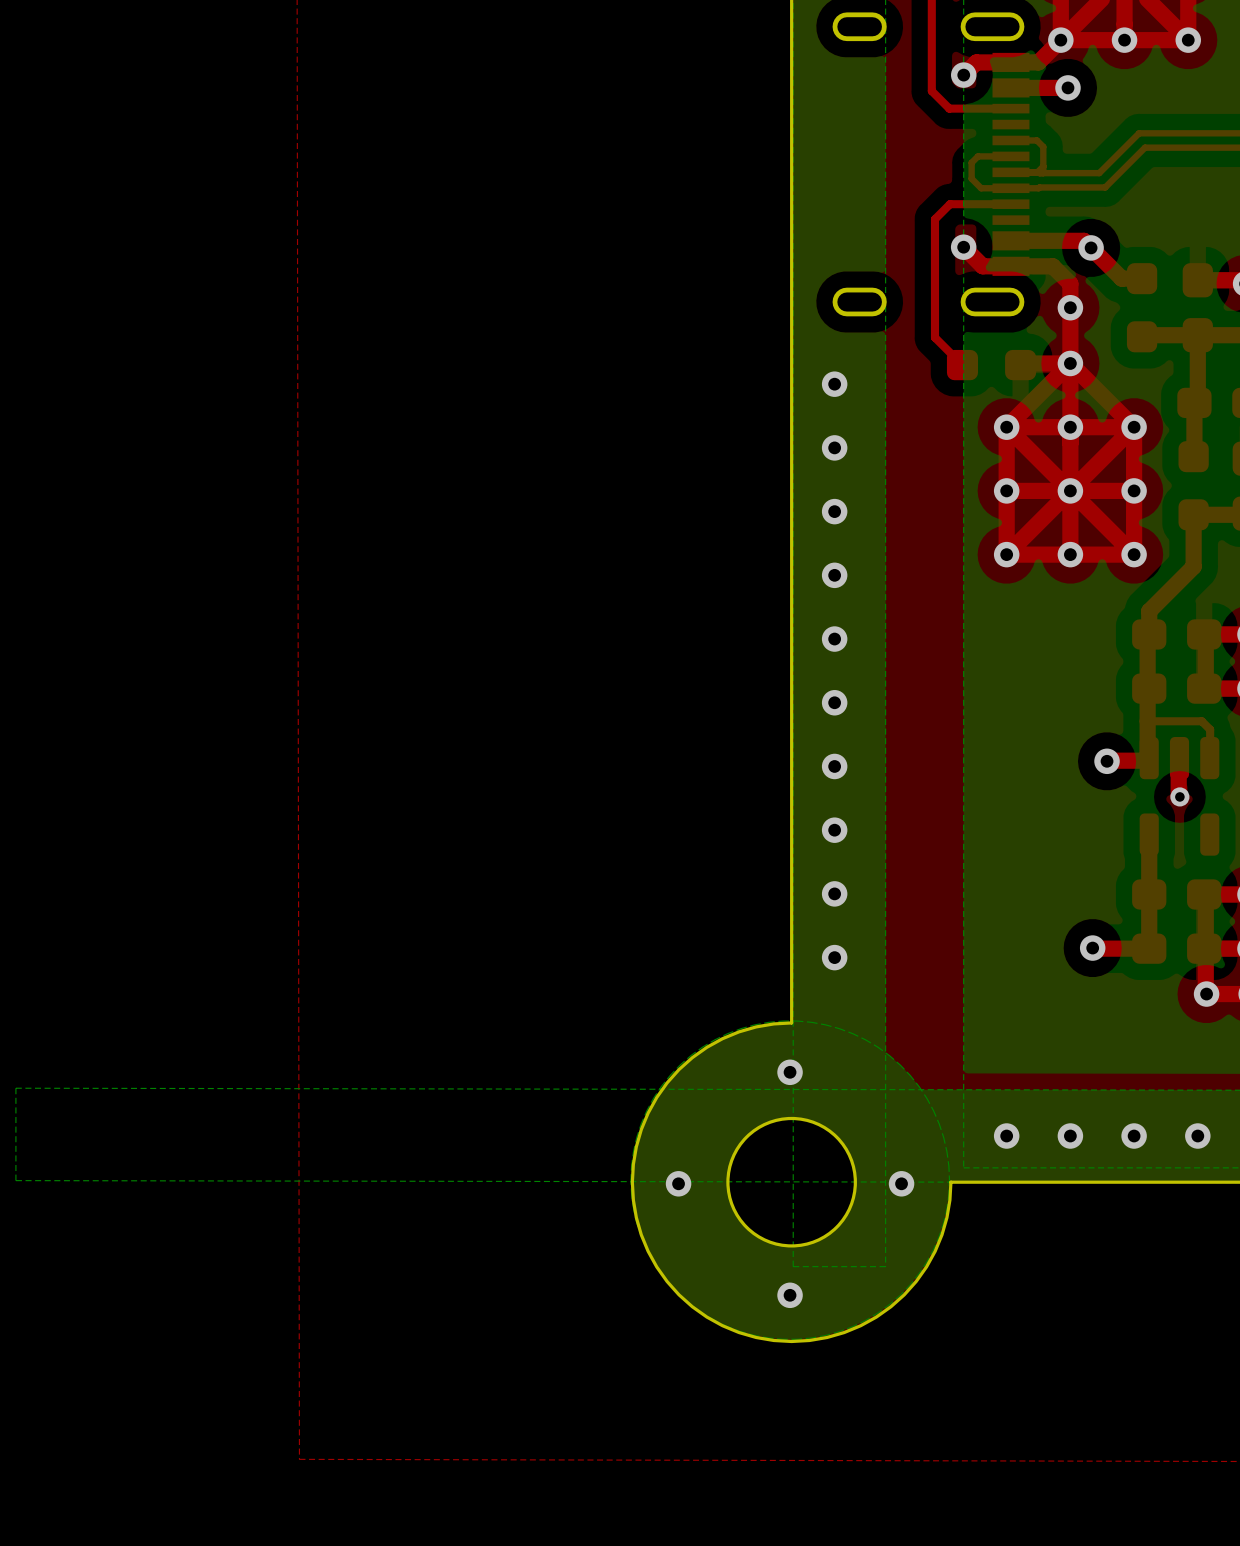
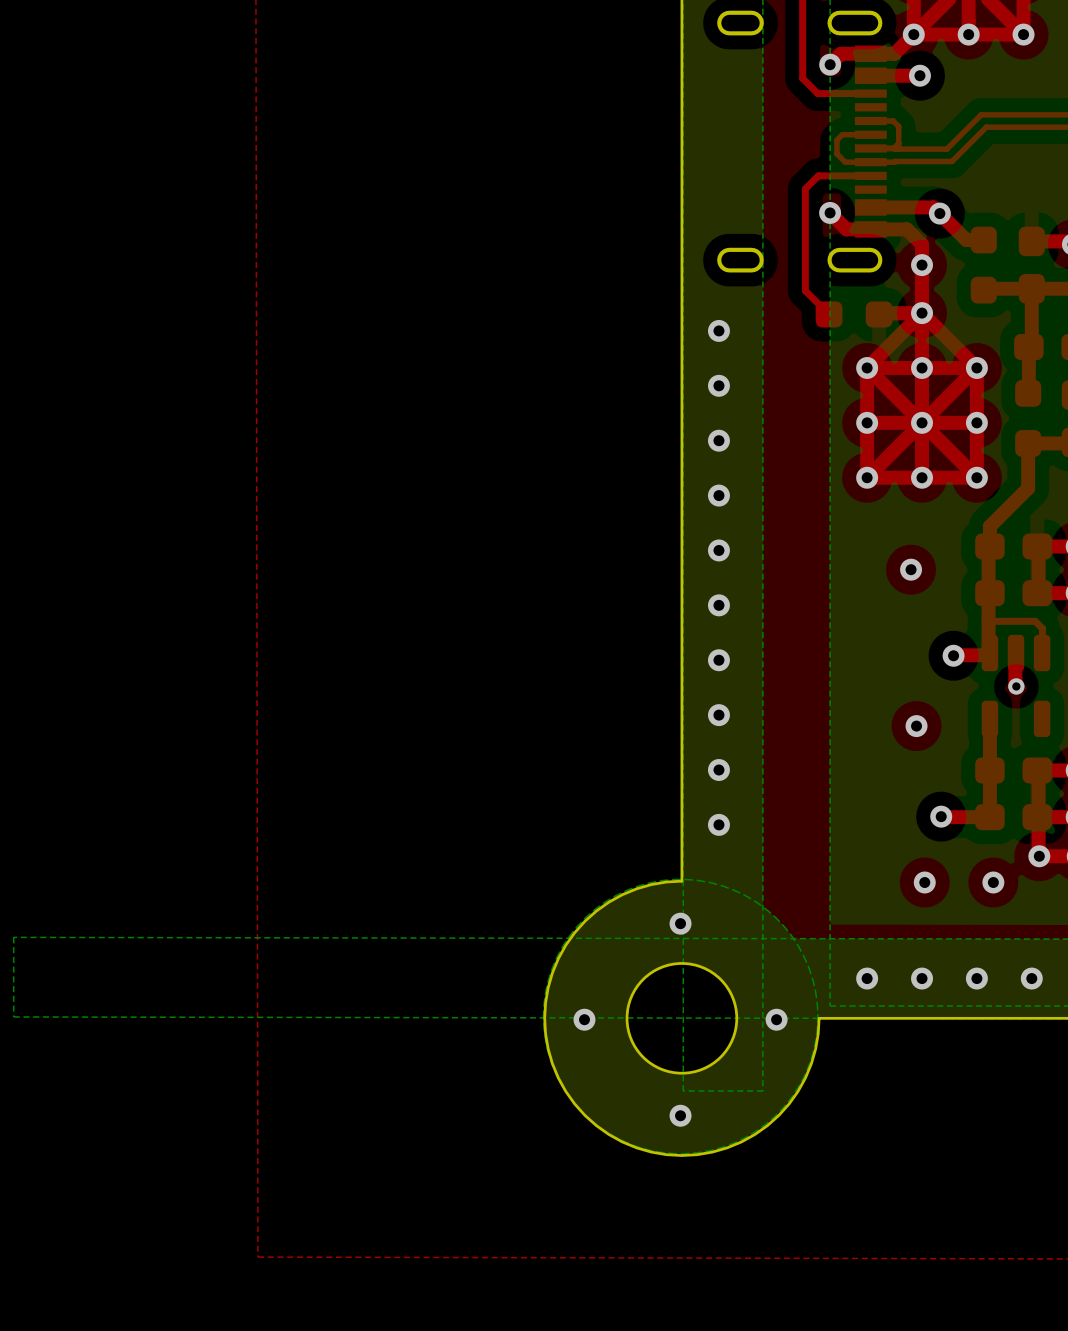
via: none -> (911, 569)
via: none -> (916, 726)
via: none -> (924, 882)
via: none -> (993, 882)

